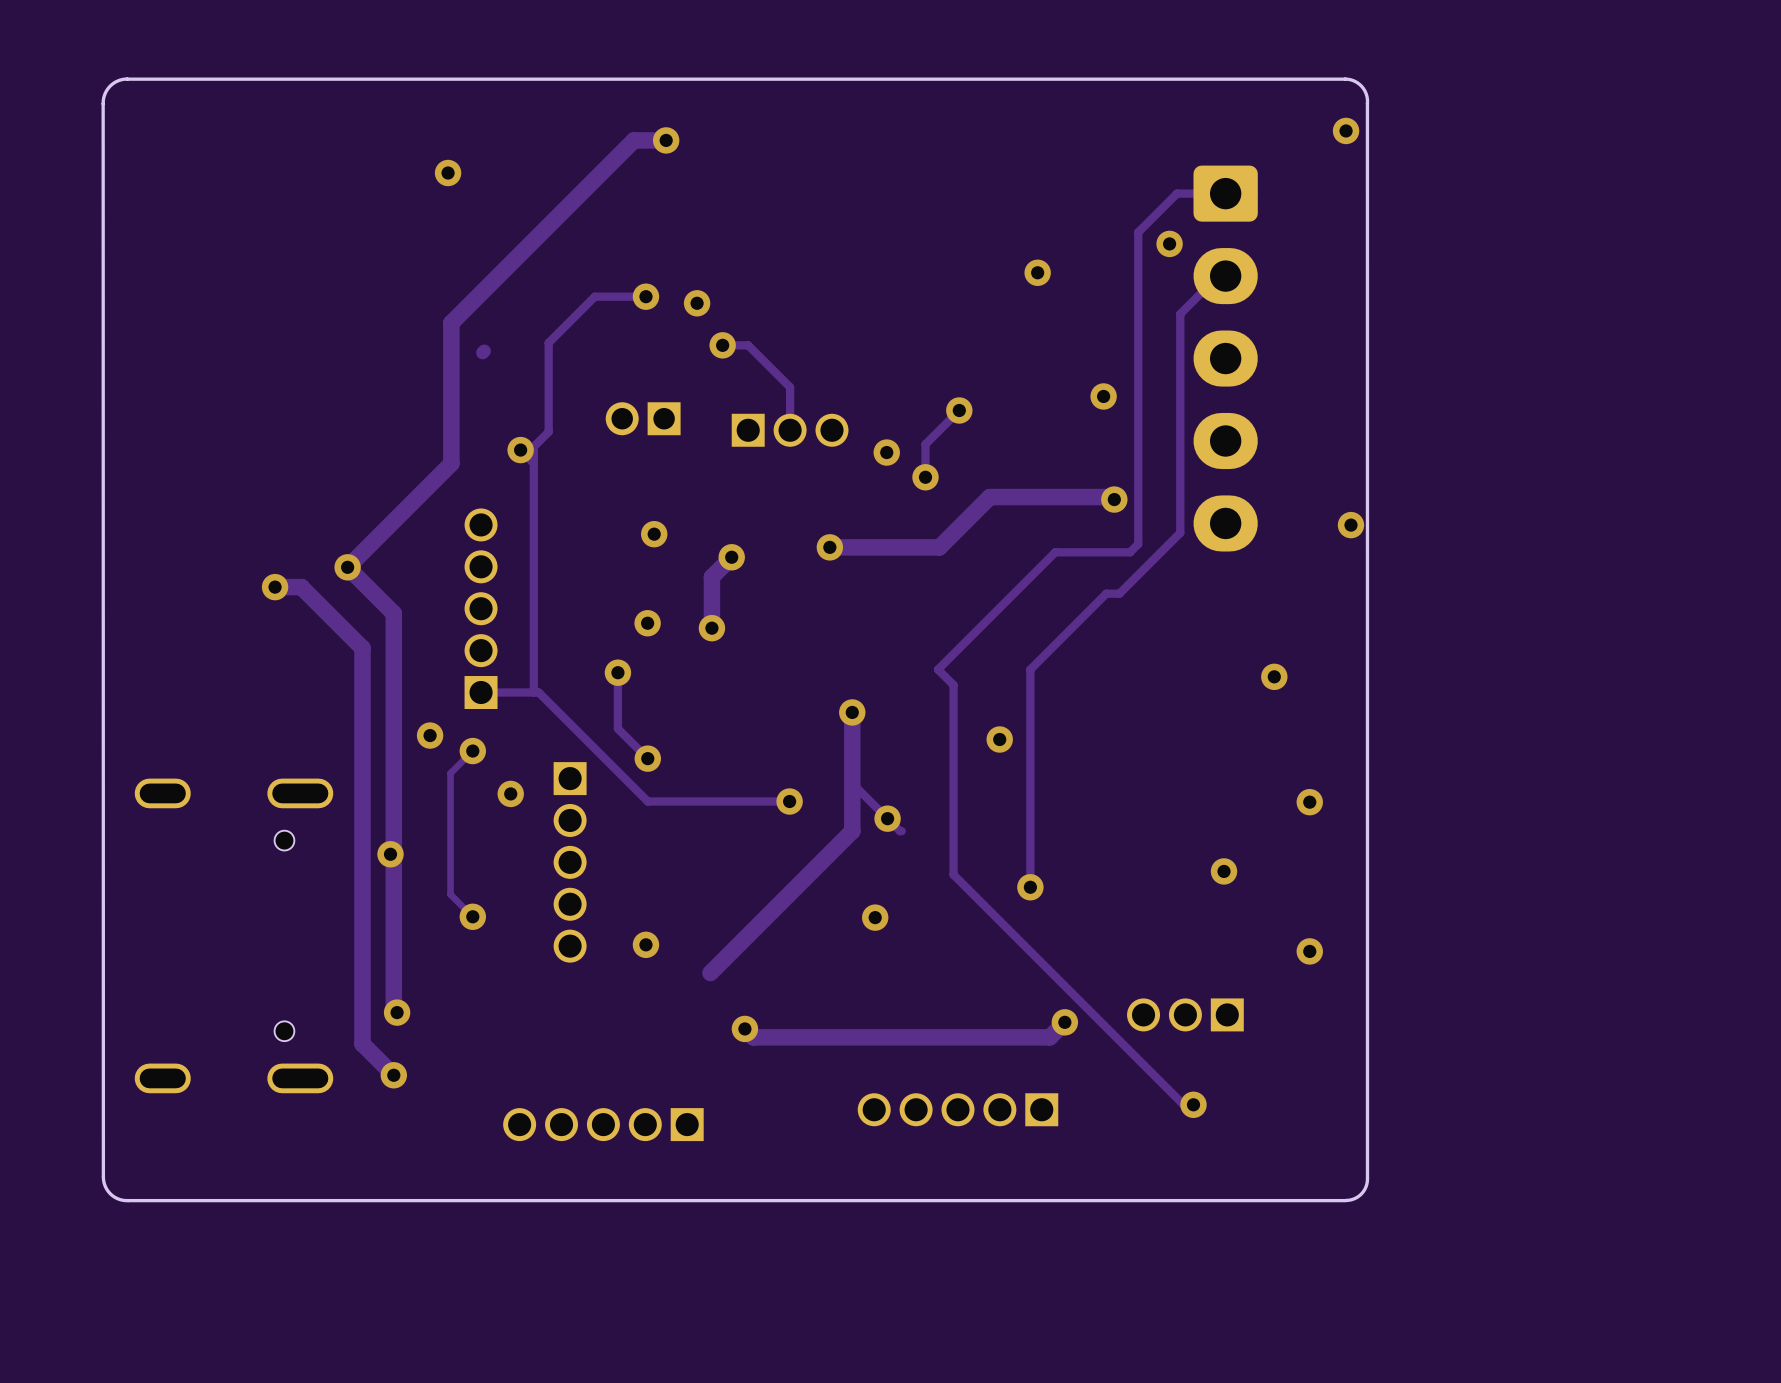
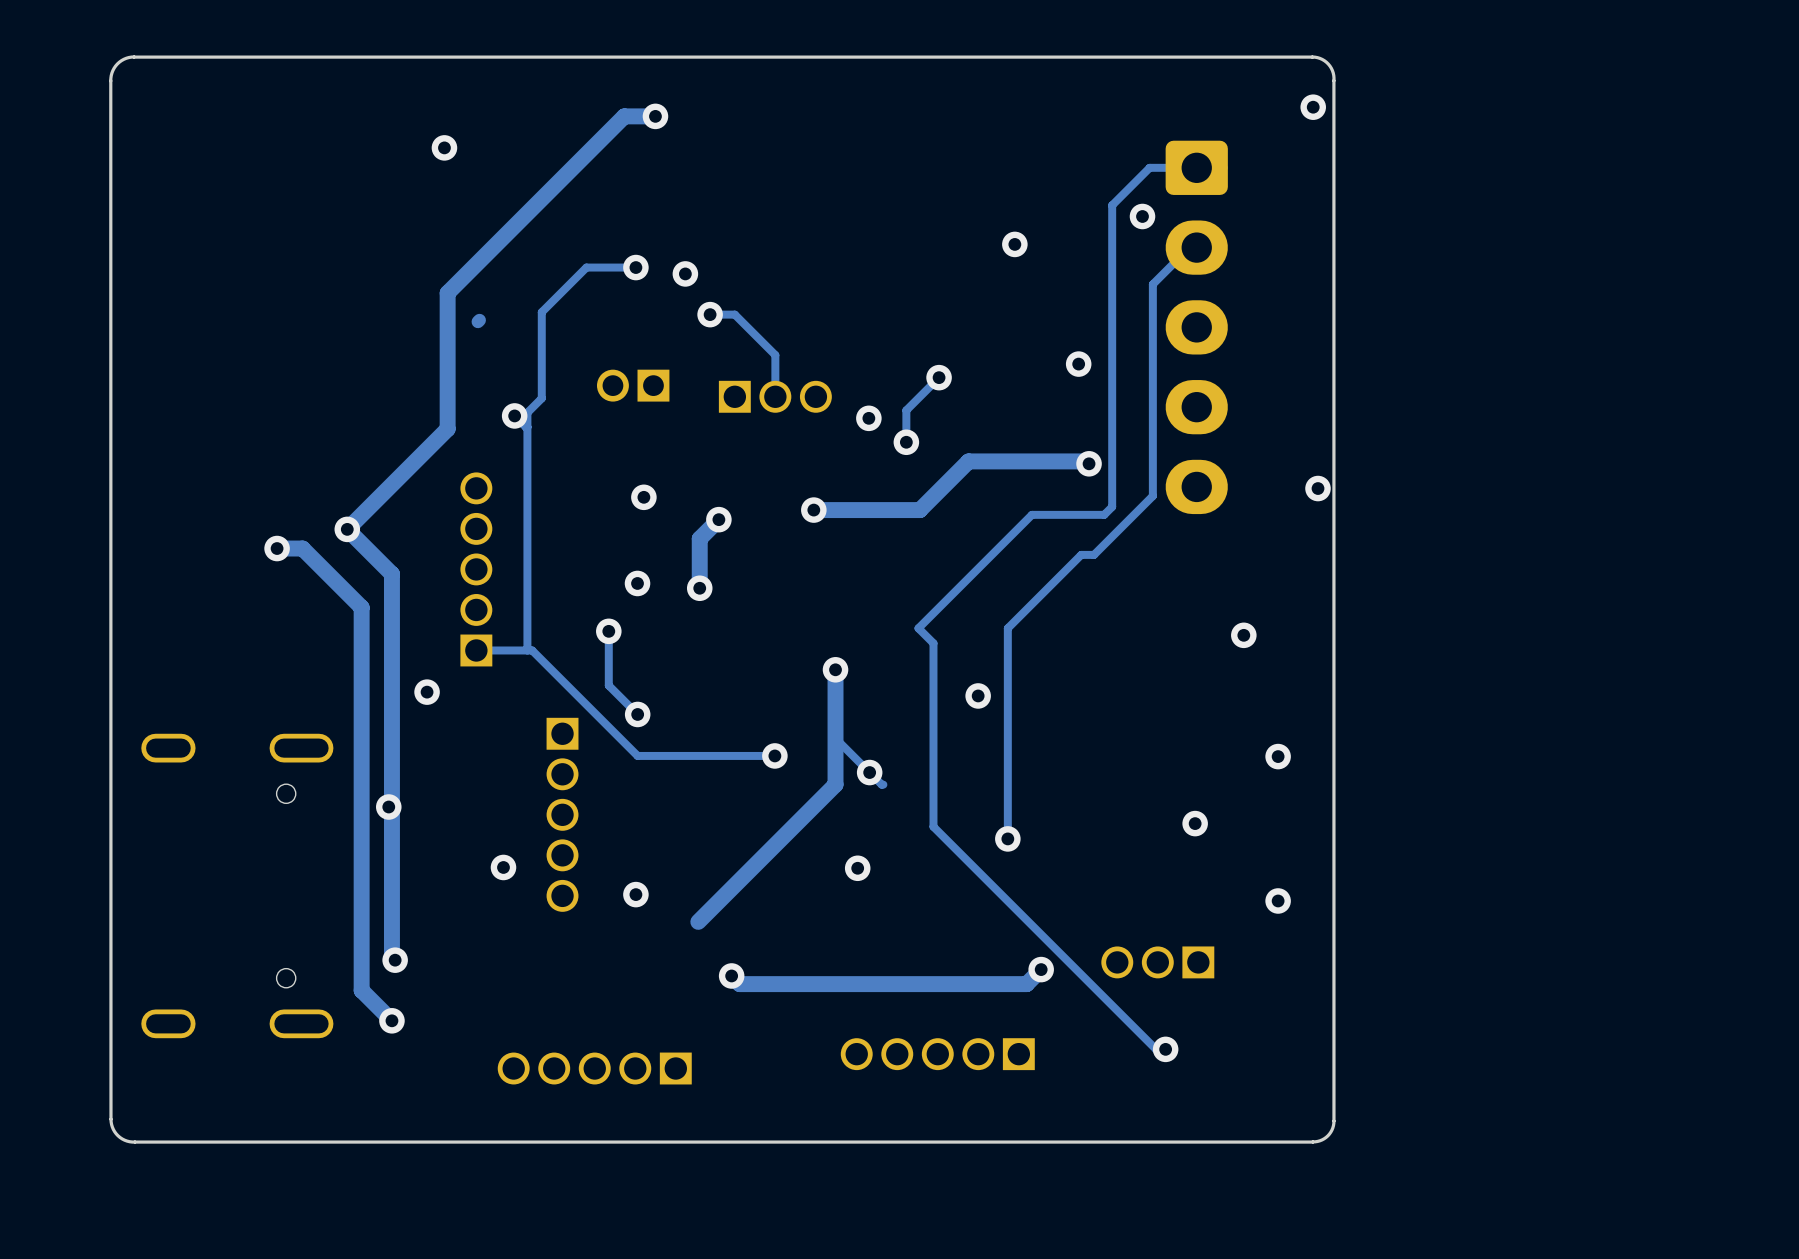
track: (472, 751) (450, 773) (450, 894) (472, 916) -> none
via: (472, 751) -> none
via: (510, 793) -> none
via position: (472, 916) -> (503, 867)

